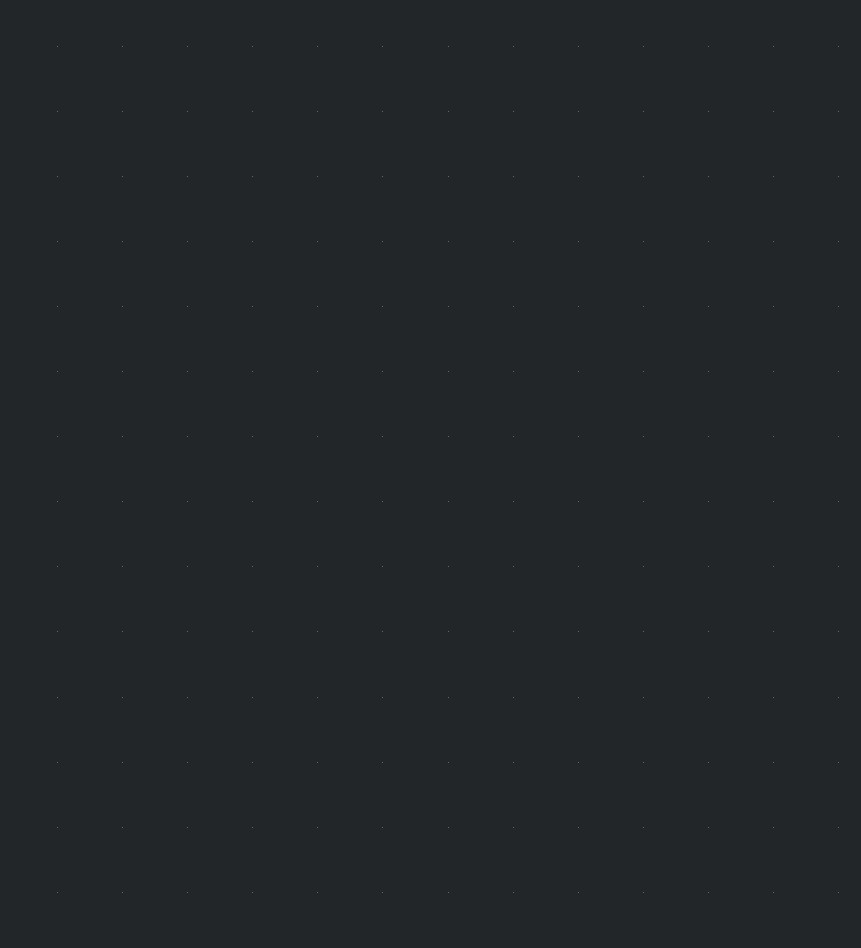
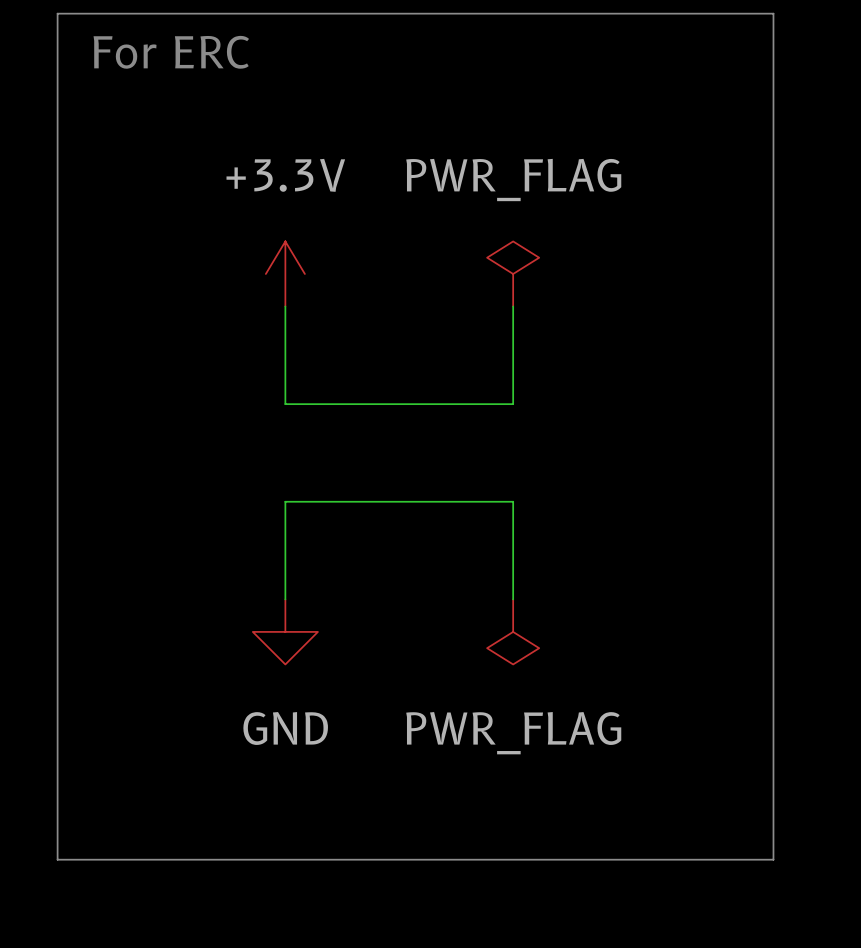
line: none -> (57, 13) (773, 13) (773, 859) (57, 859) (57, 13)
text: none -> For ERC (171, 52)
power symbol: none -> +3.3V (285, 273)
power symbol: none -> PWR_FLAG (513, 273)
wire: none -> (285, 306) (285, 404) (513, 404) (513, 306)
wire: none -> (285, 599) (285, 501) (513, 501) (513, 599)
power symbol: none -> GND (285, 631)
power symbol: none -> PWR_FLAG (513, 631)

